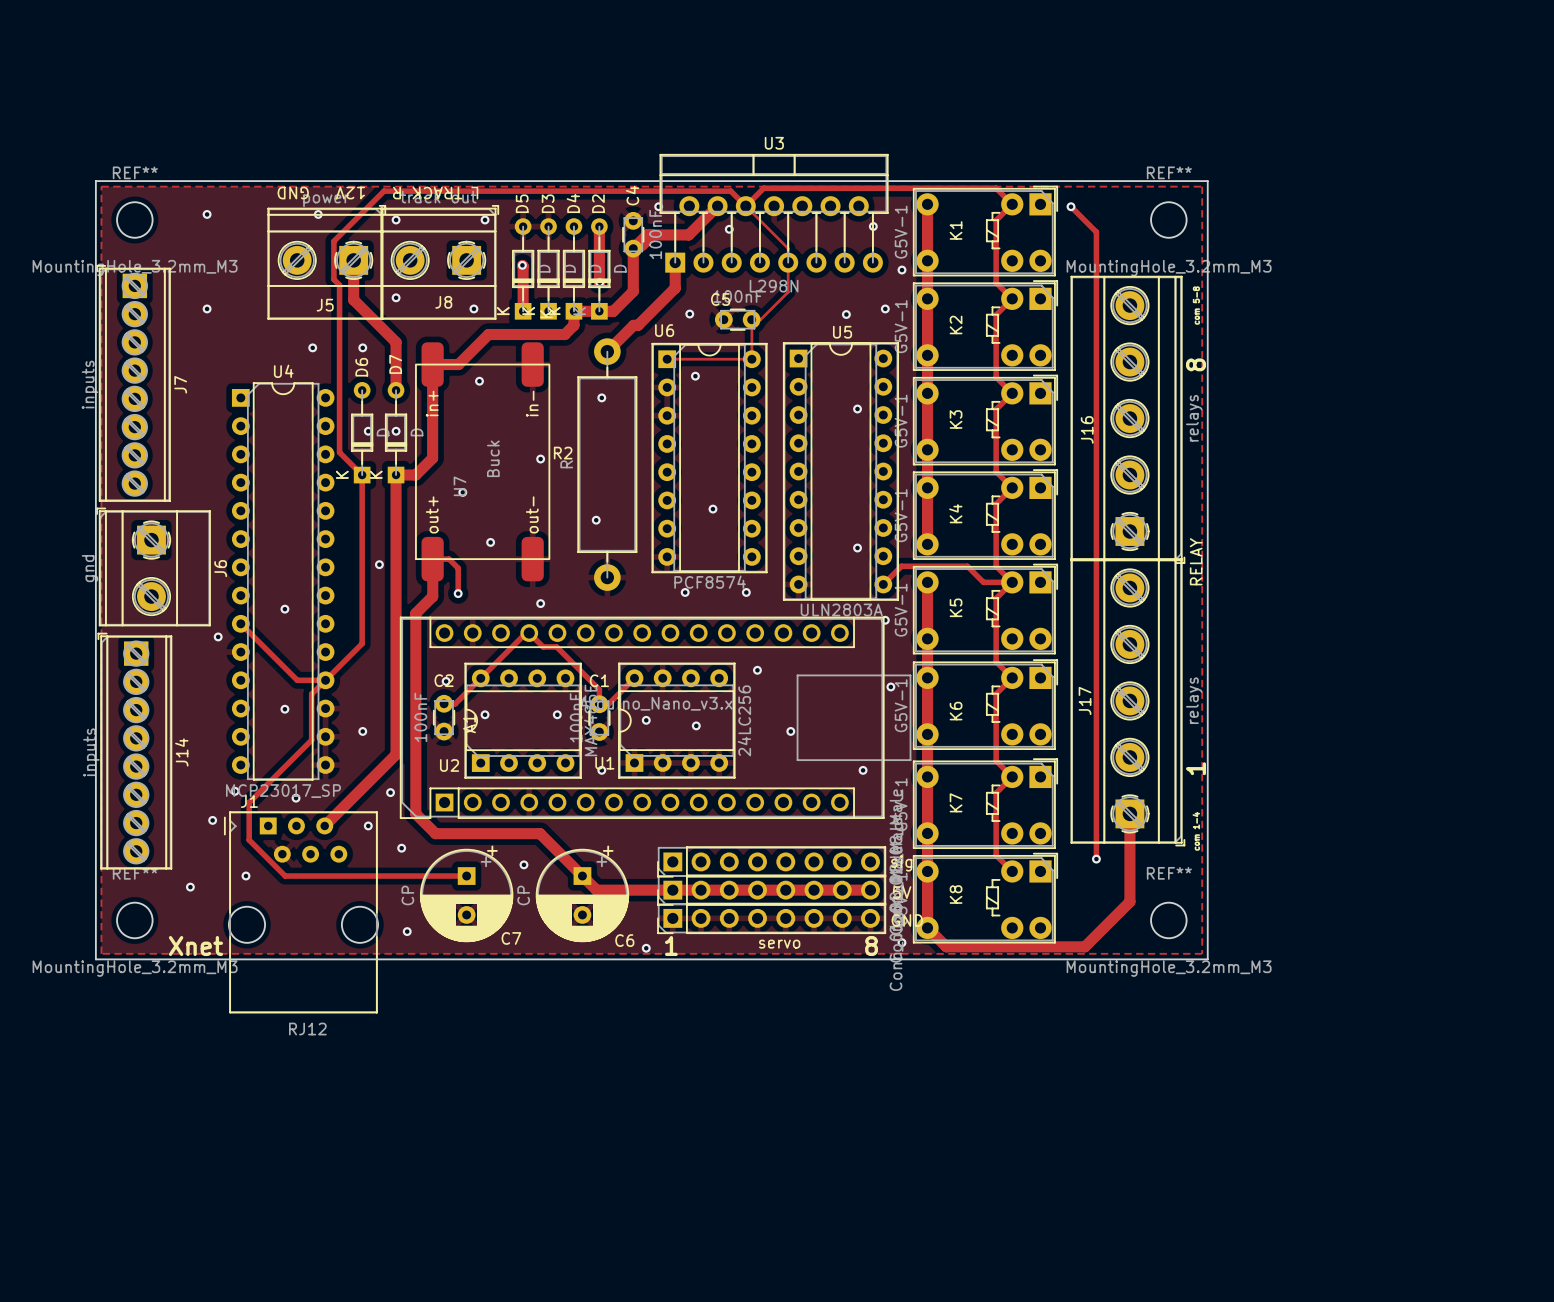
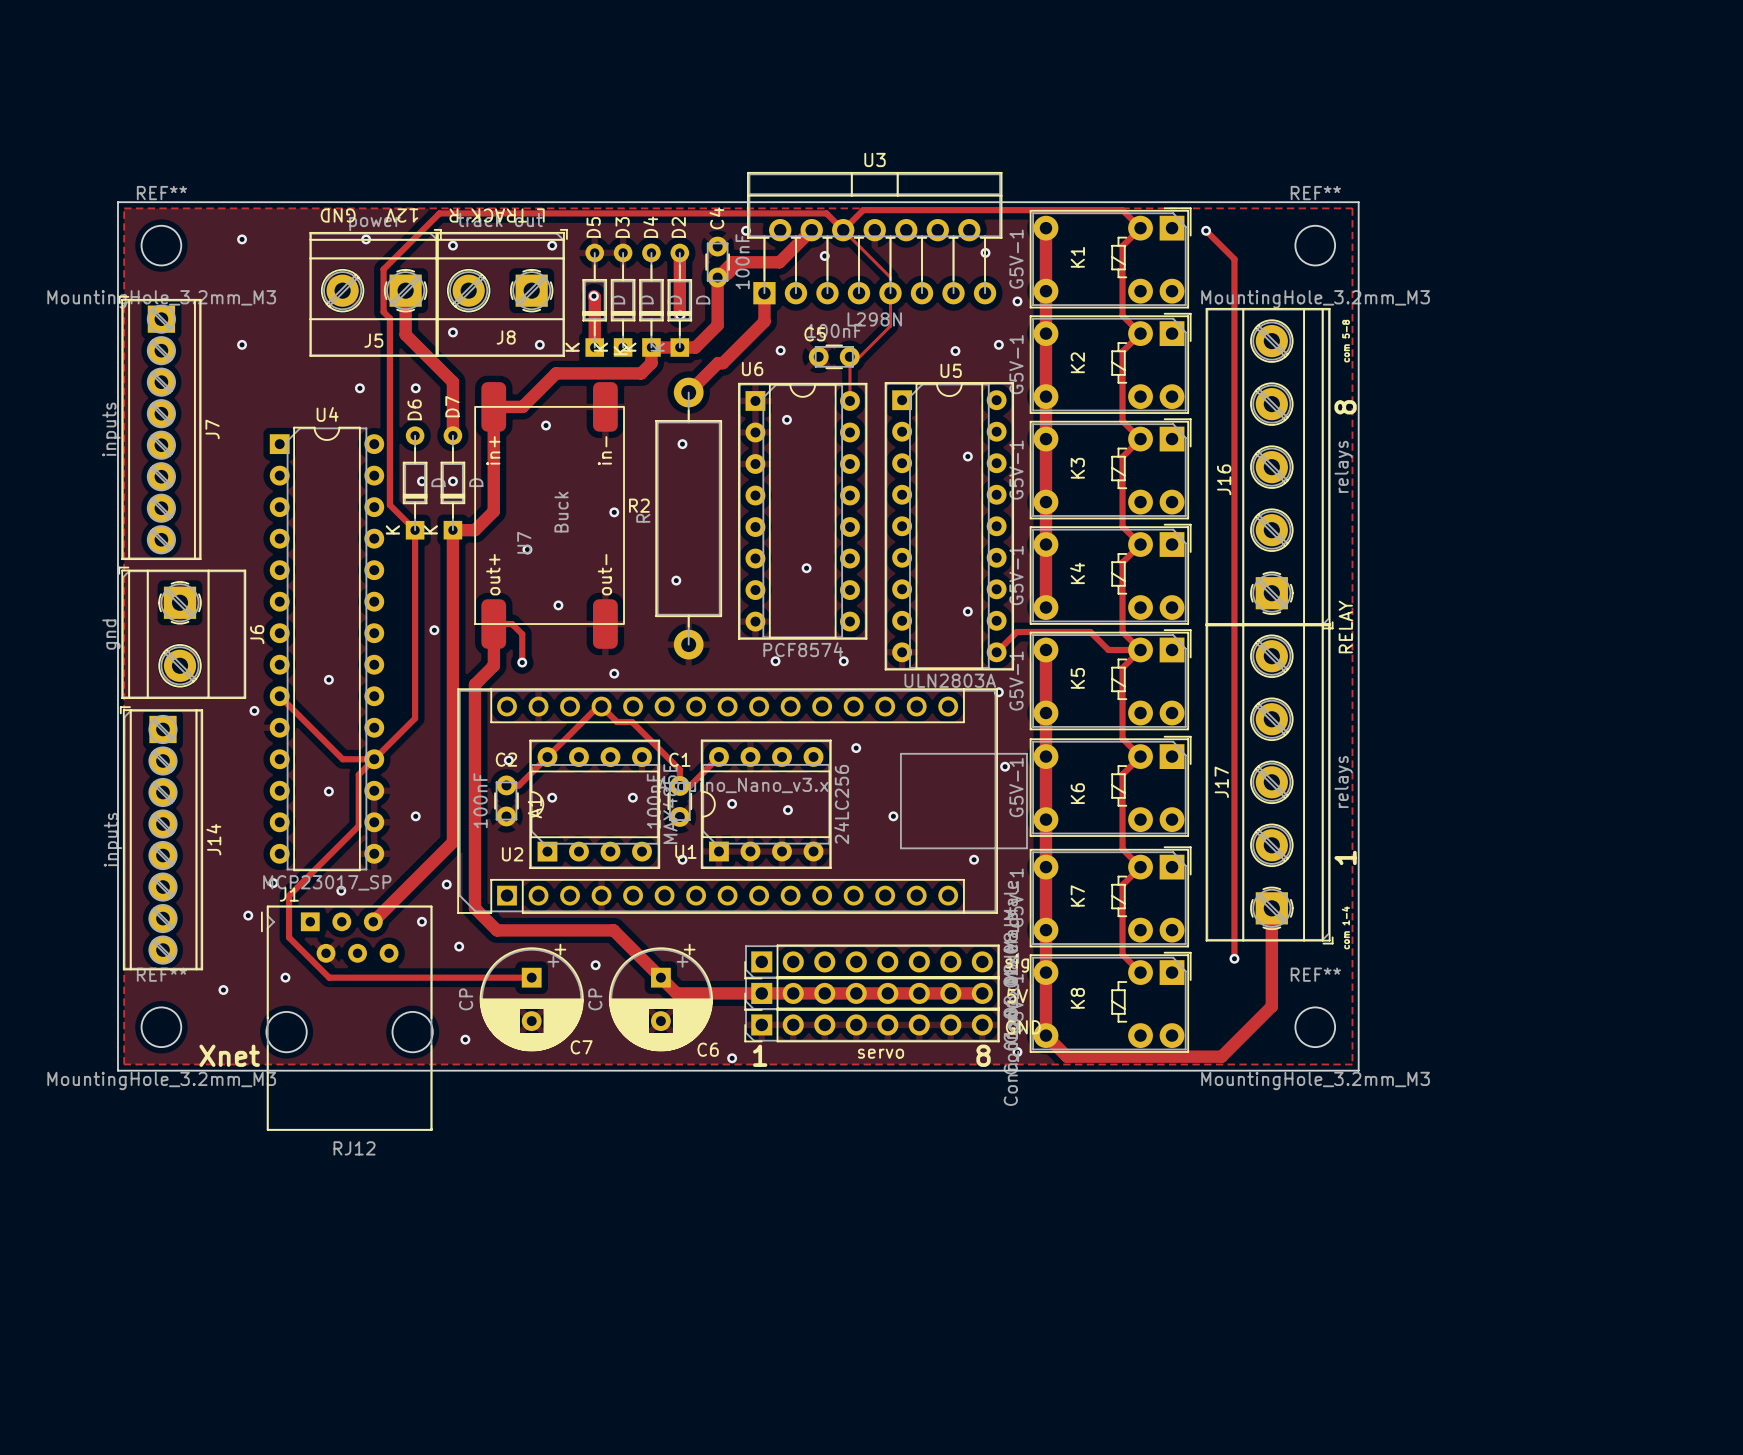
track: (667, 359) (751, 359) -> none

